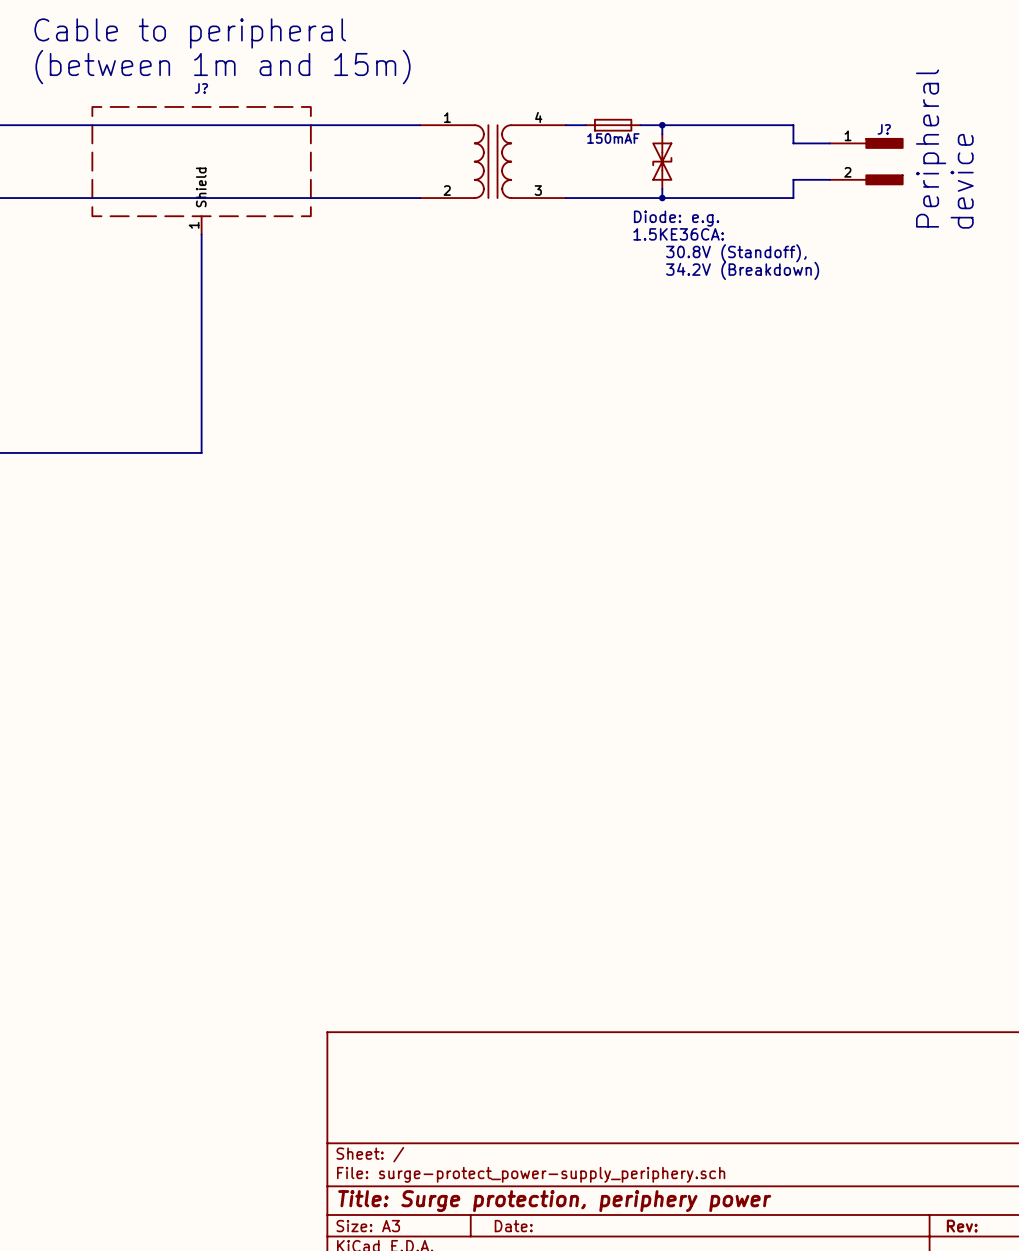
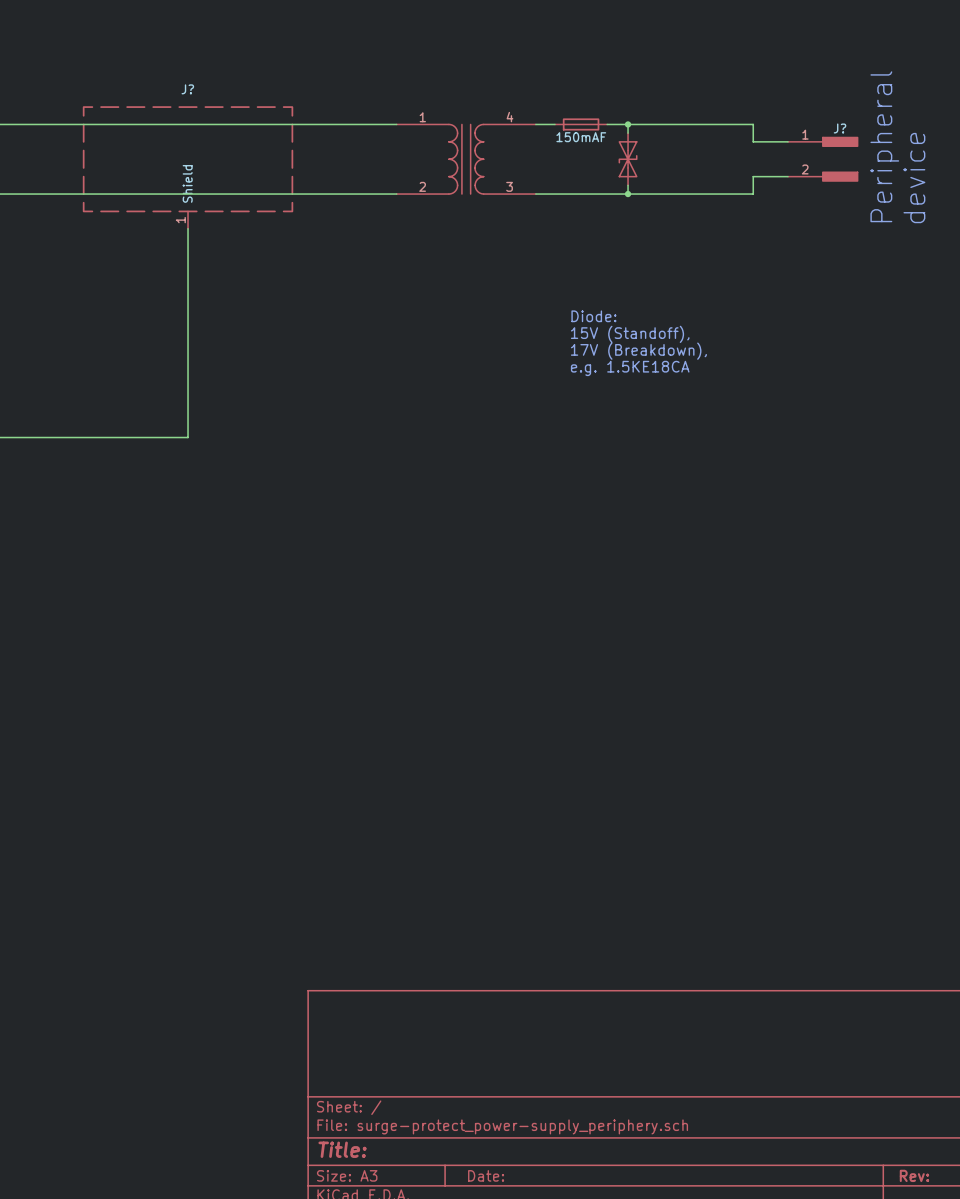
text: Cable to peripheral (190, 33) -> none
text: (between 1m and 15m) (223, 67) -> none
text: Diode: e.g. (676, 218) -> none
text: 1.5KE36CA: (678, 234) -> none
text: 30.8V (Standoff), (736, 253) -> none
text: 34.2V (Breakdown) (742, 270) -> none
text: none -> Diode: (593, 316)
text: none -> 15V (Standoff), (630, 334)
text: none -> 17V (Breakdown), (638, 351)
text: none -> e.g. 1.5KE18CA (630, 368)
title block: Title: Surge protection, periphery power (554, 1201) -> Title: (342, 1149)

